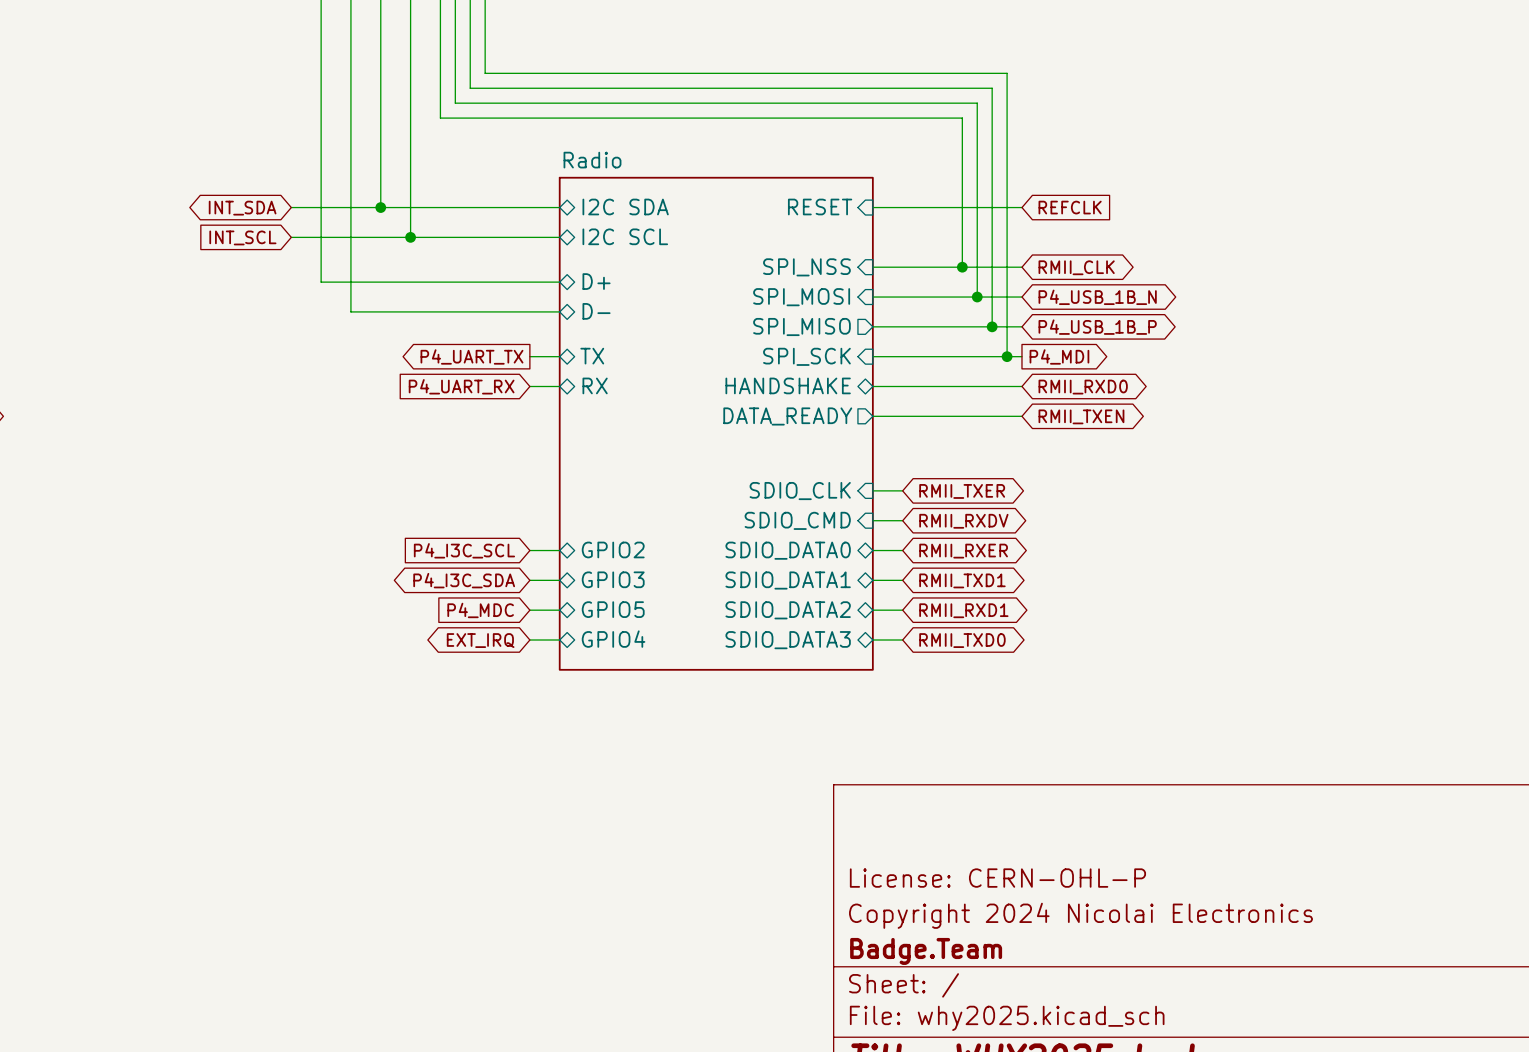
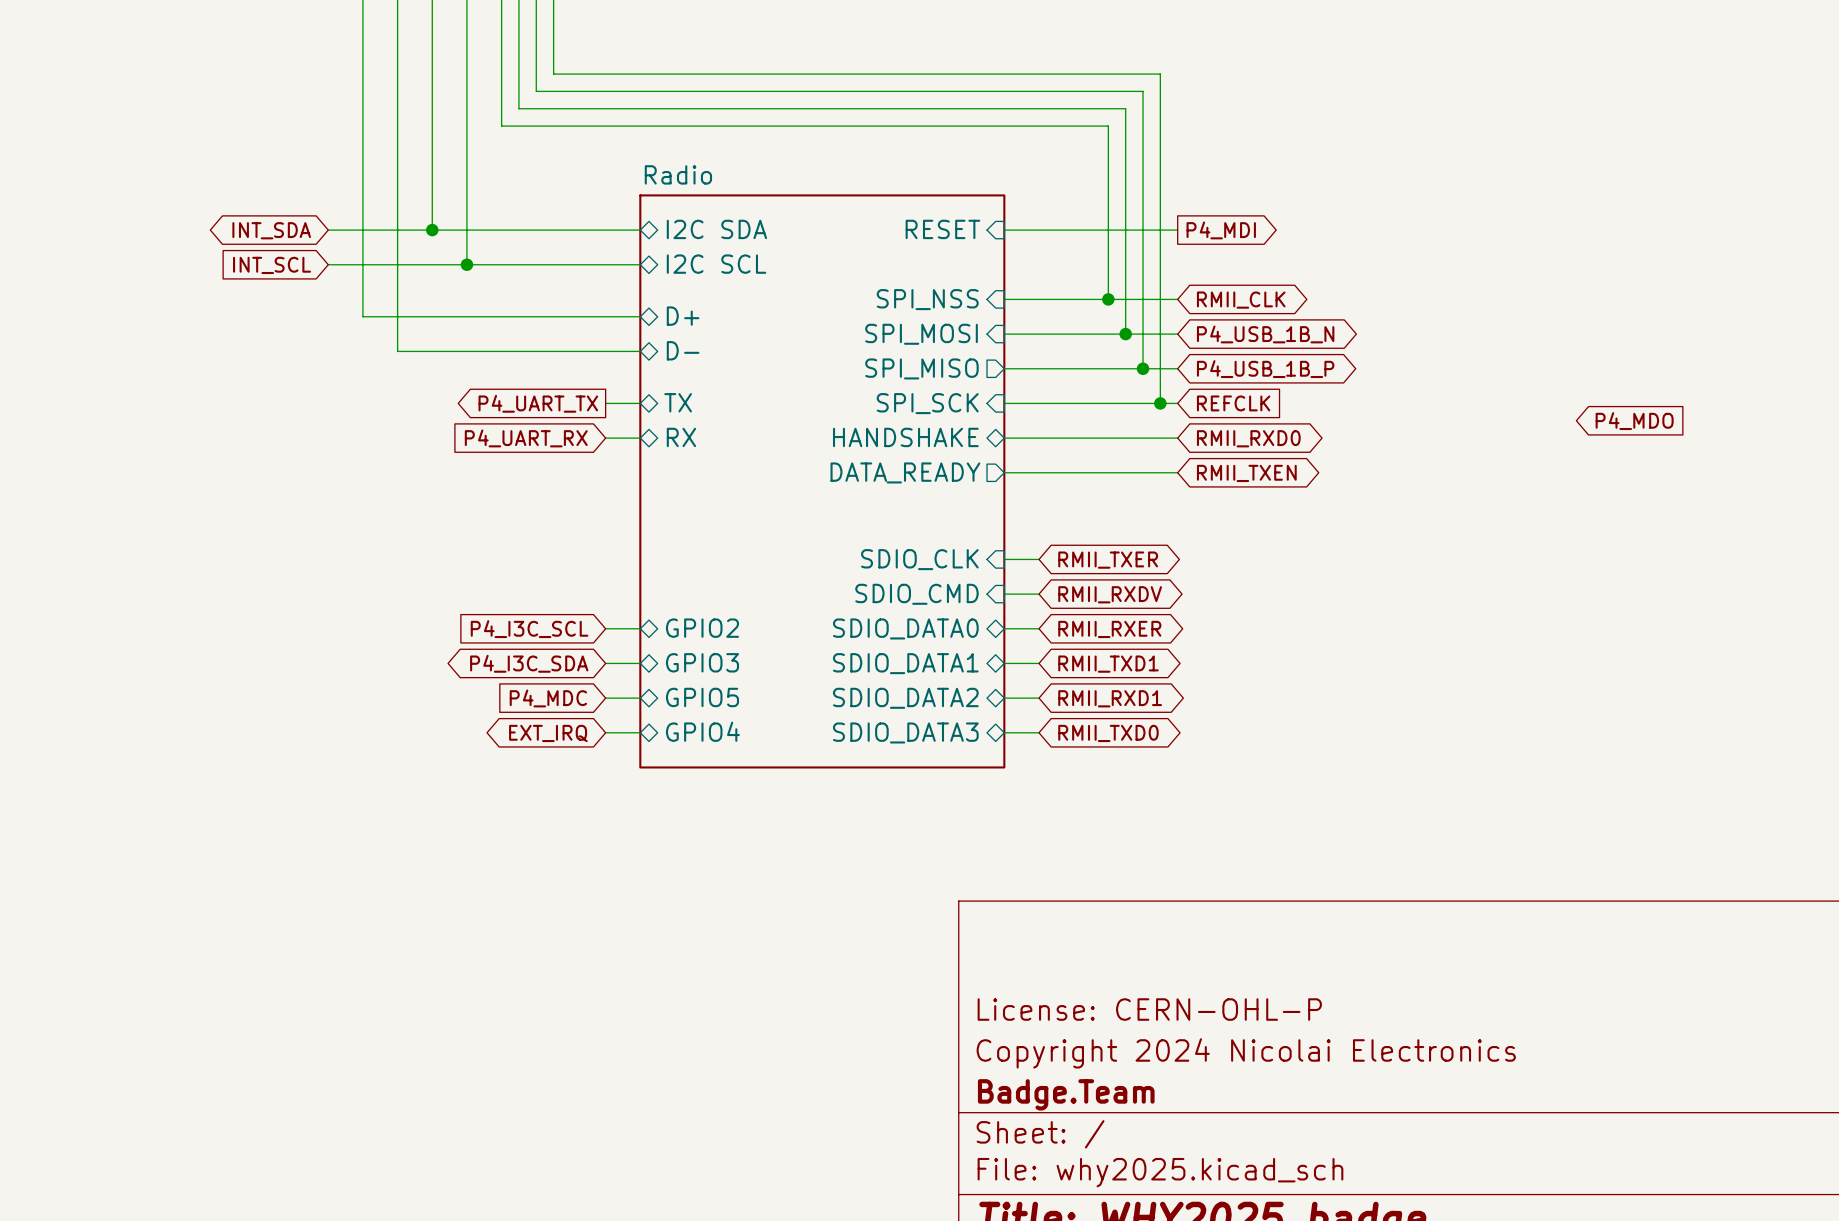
global label shape: input (1070, 207) -> output (1221, 230)
global label: REFCLK (1070, 207) -> P4_MDI (1221, 230)
global label shape: output (1059, 356) -> input (1233, 403)
global label: P4_MDI (1059, 356) -> REFCLK (1233, 403)
global label: none -> P4_MDO (1634, 421)

